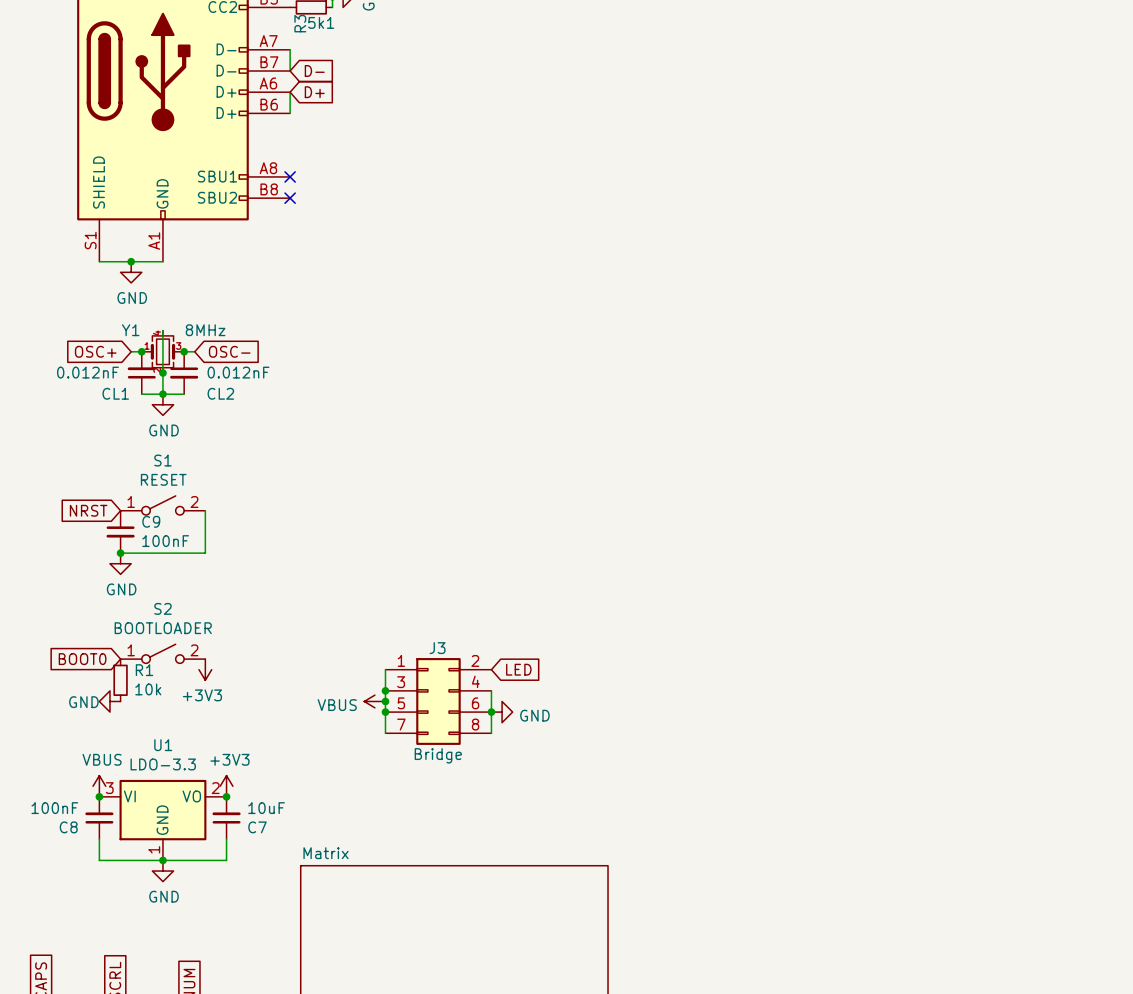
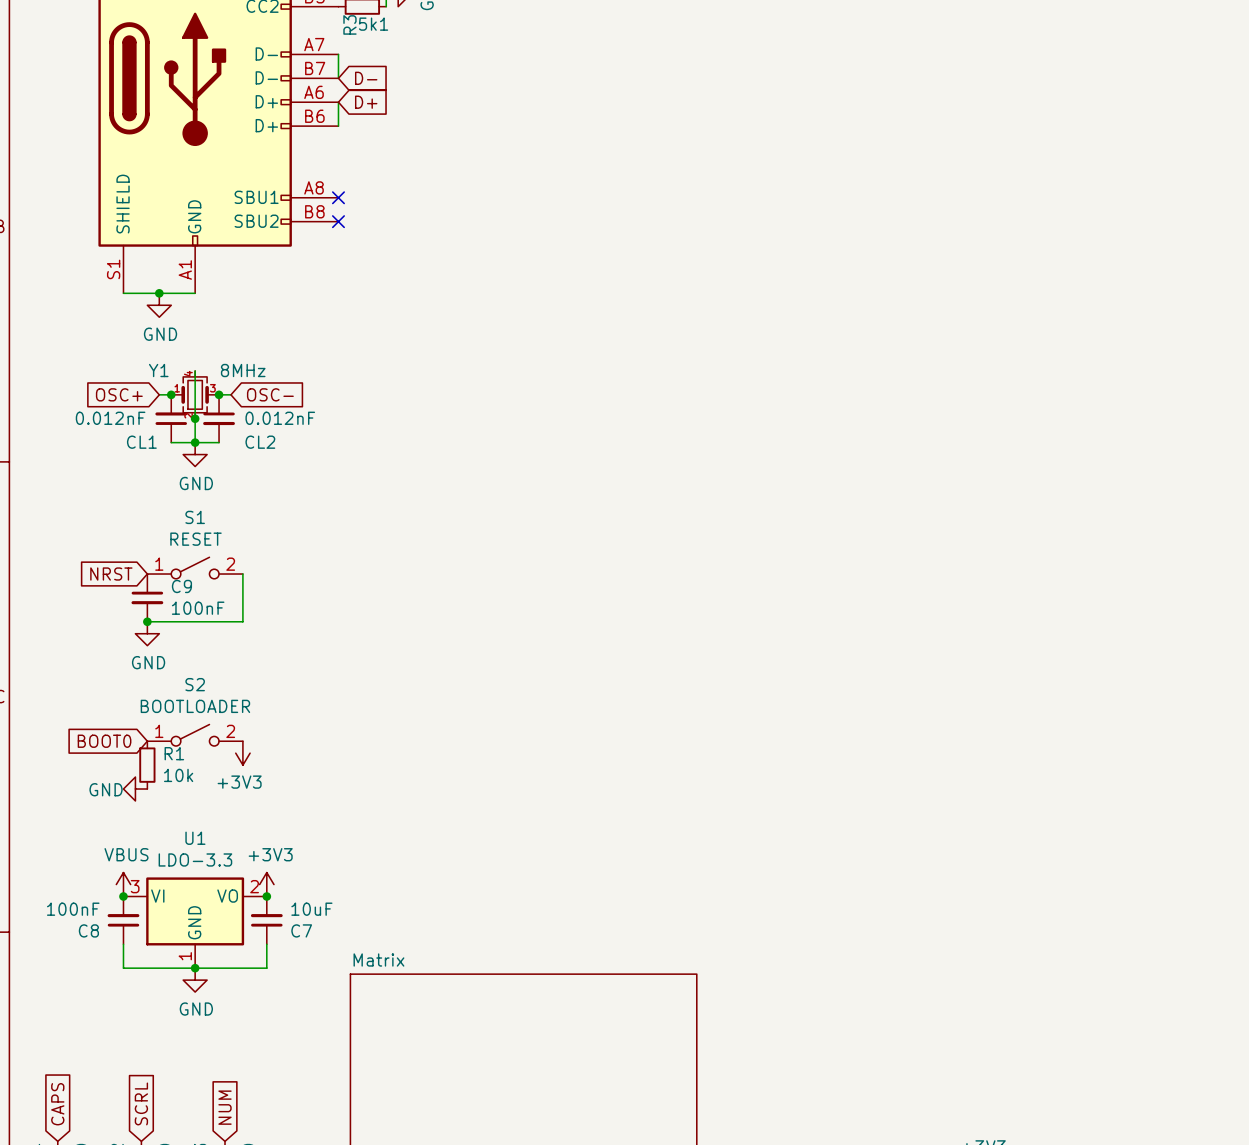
wire: (385, 669) (385, 733) -> none
global label: LED (518, 669) -> none
junction: (385, 690) -> none
wire: (491, 690) (491, 733) -> none
power symbol: VBUS (374, 701) -> none
junction: (385, 701) -> none
J3: Bridge (438, 701) -> none
junction: (385, 712) -> none
junction: (491, 712) -> none
power symbol: GND (502, 712) -> none

